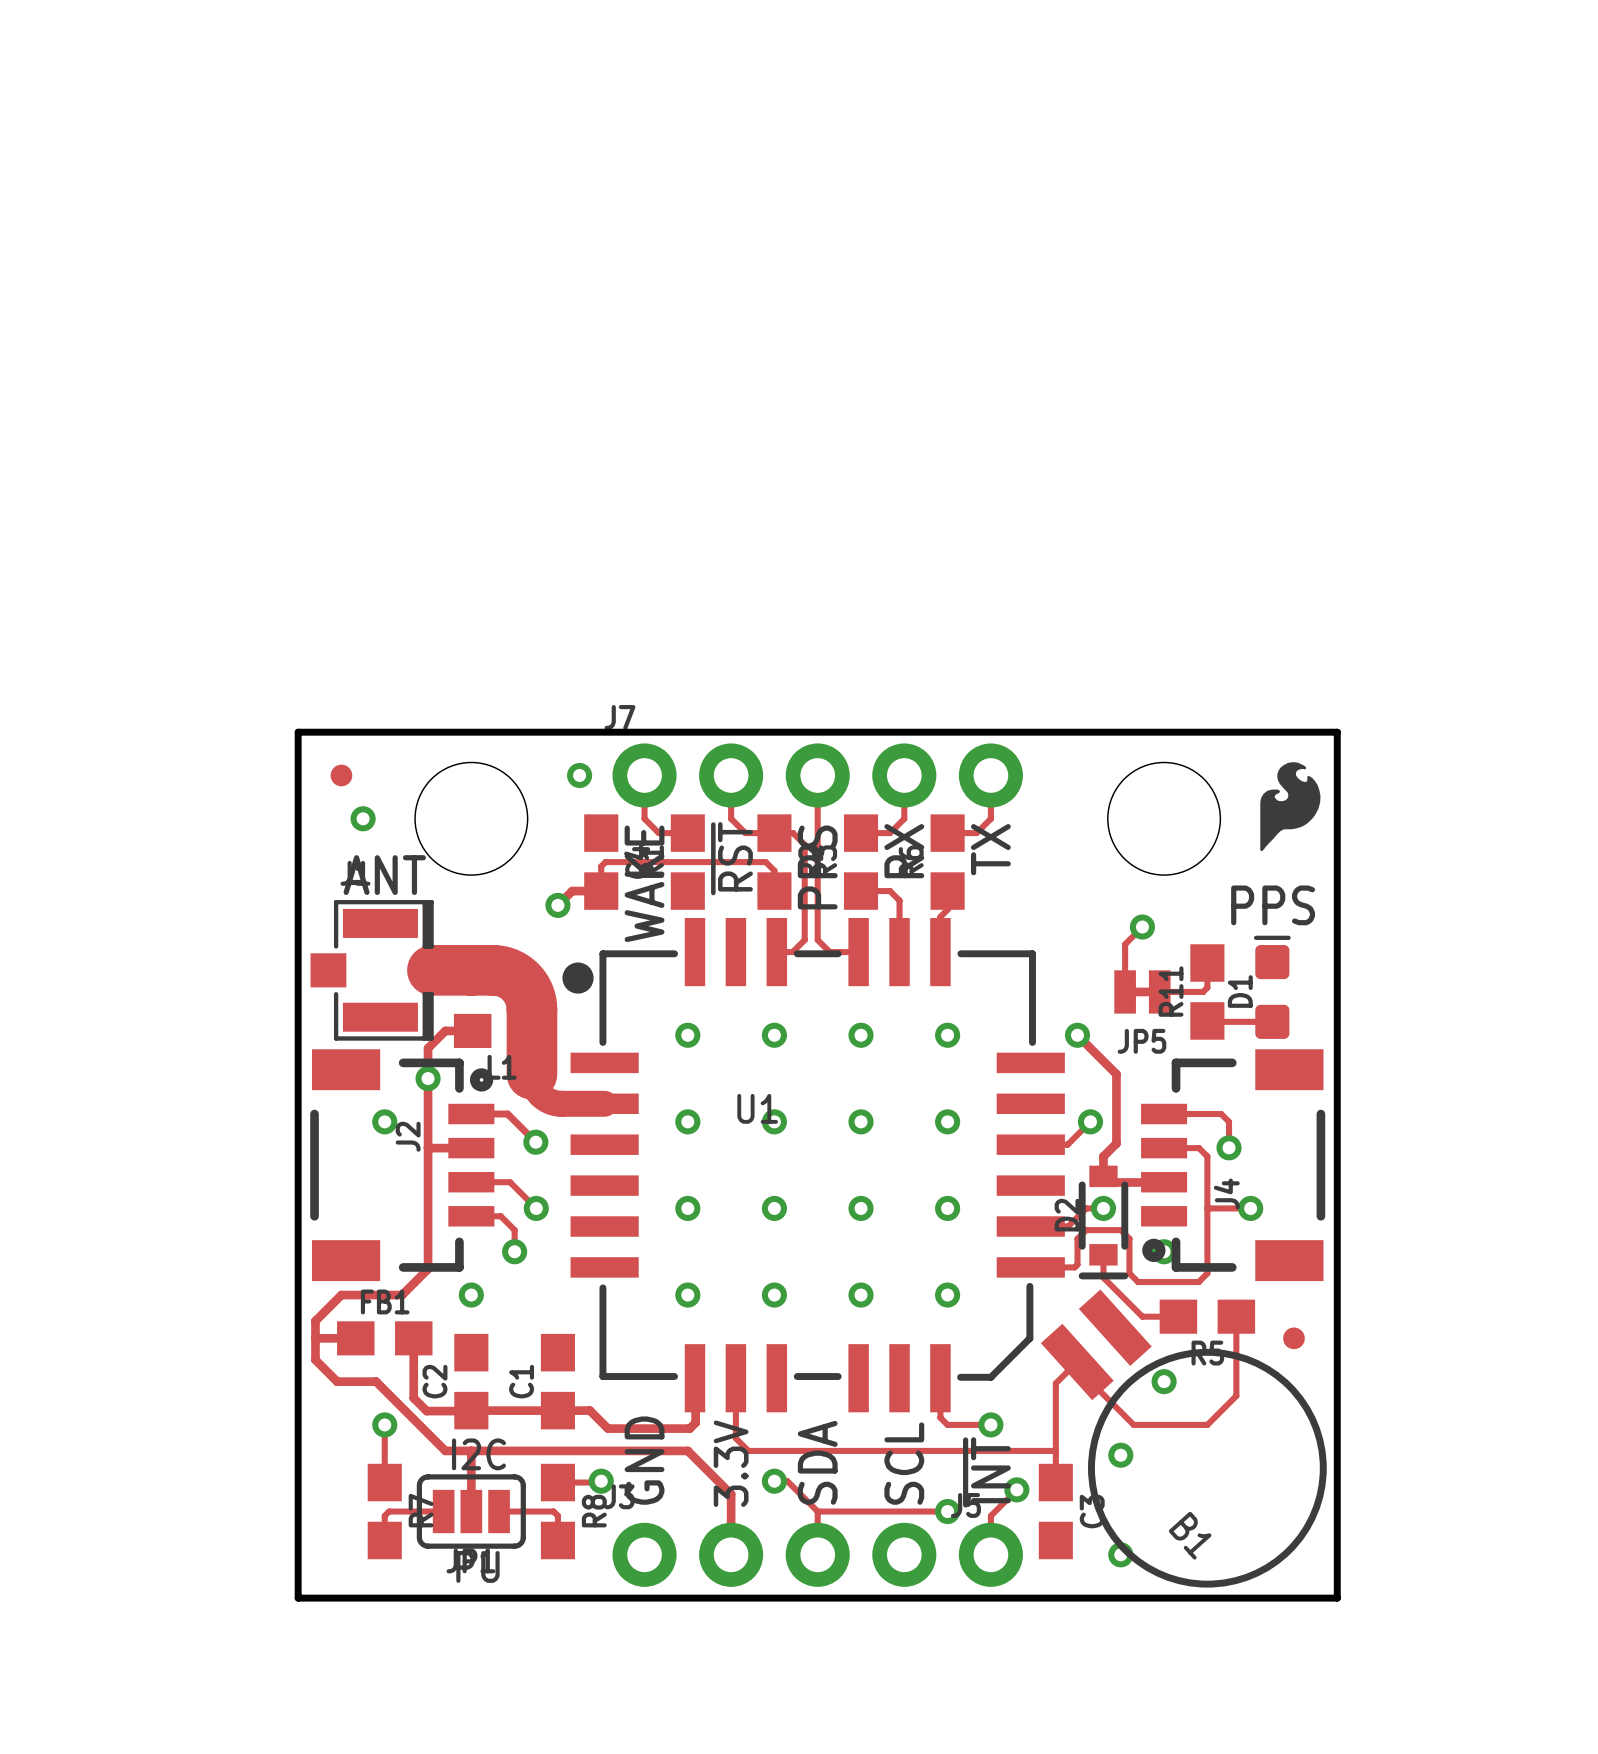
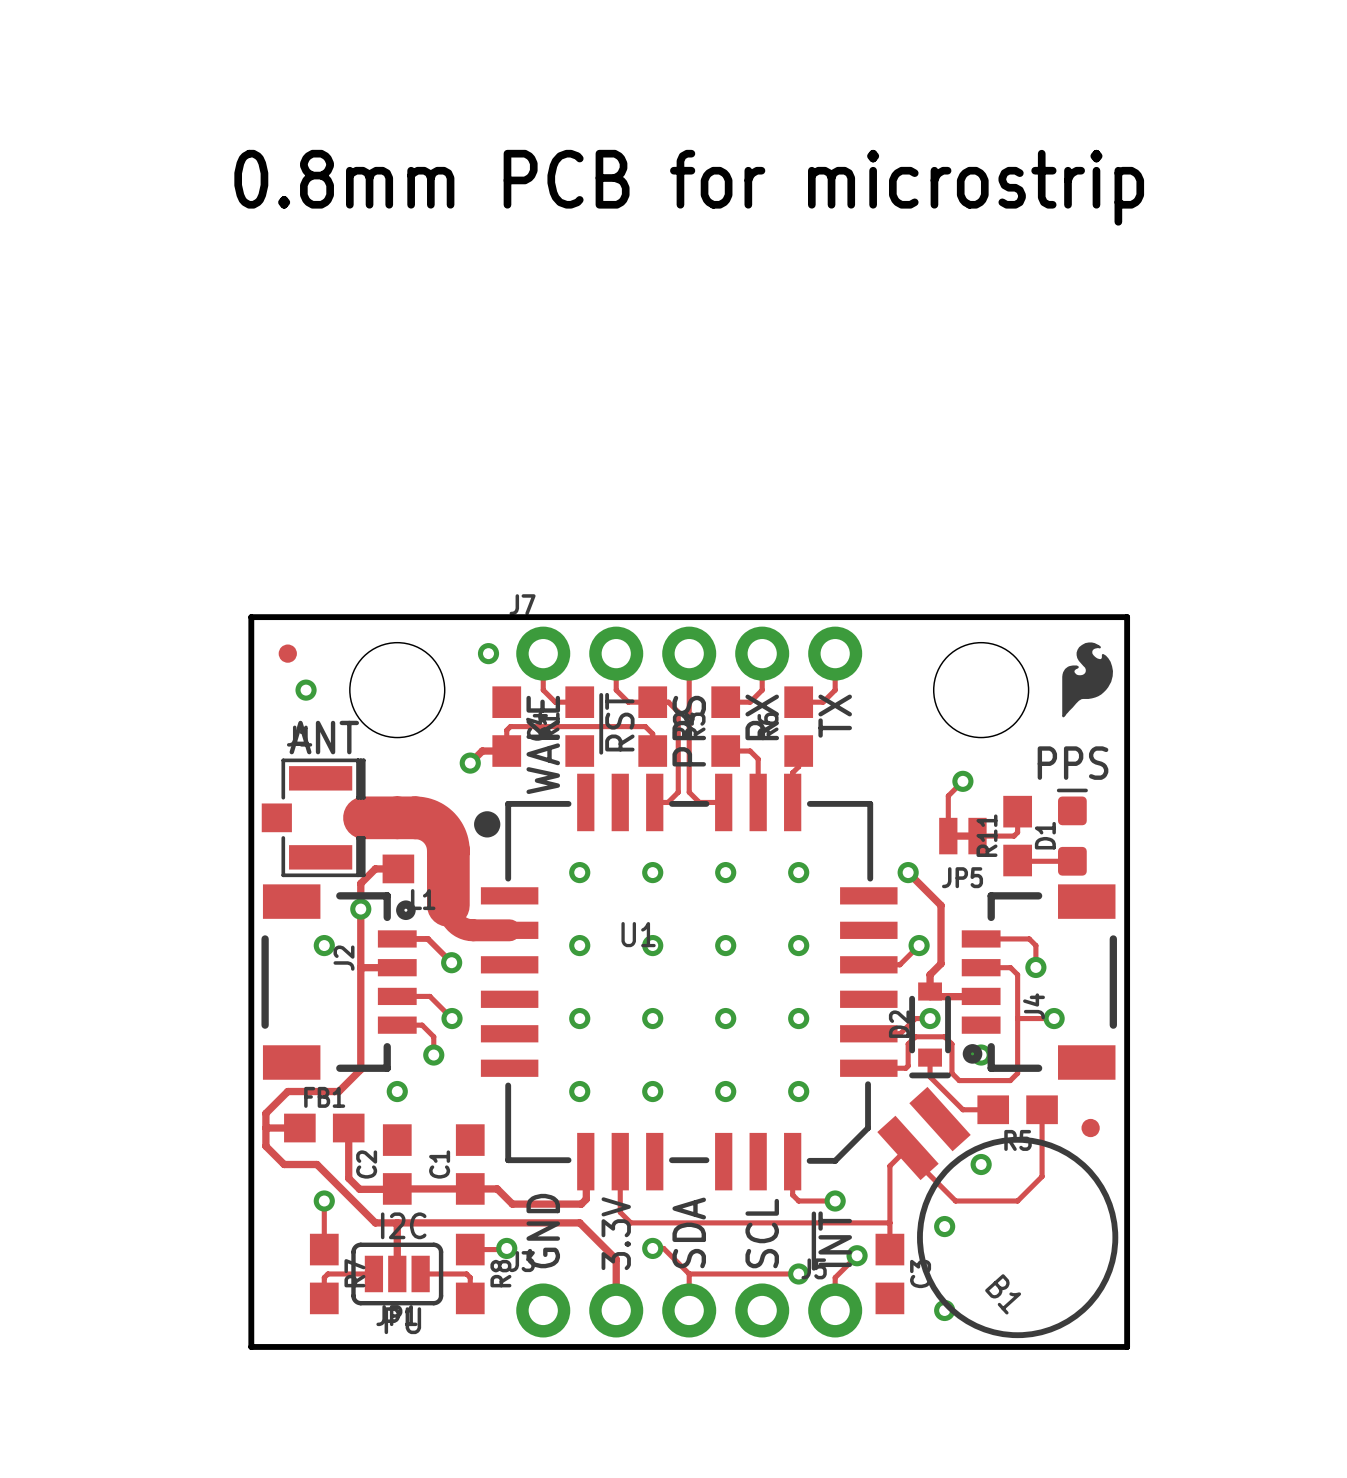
text: none -> 0.8mm PCB for microstrip (689, 187)

